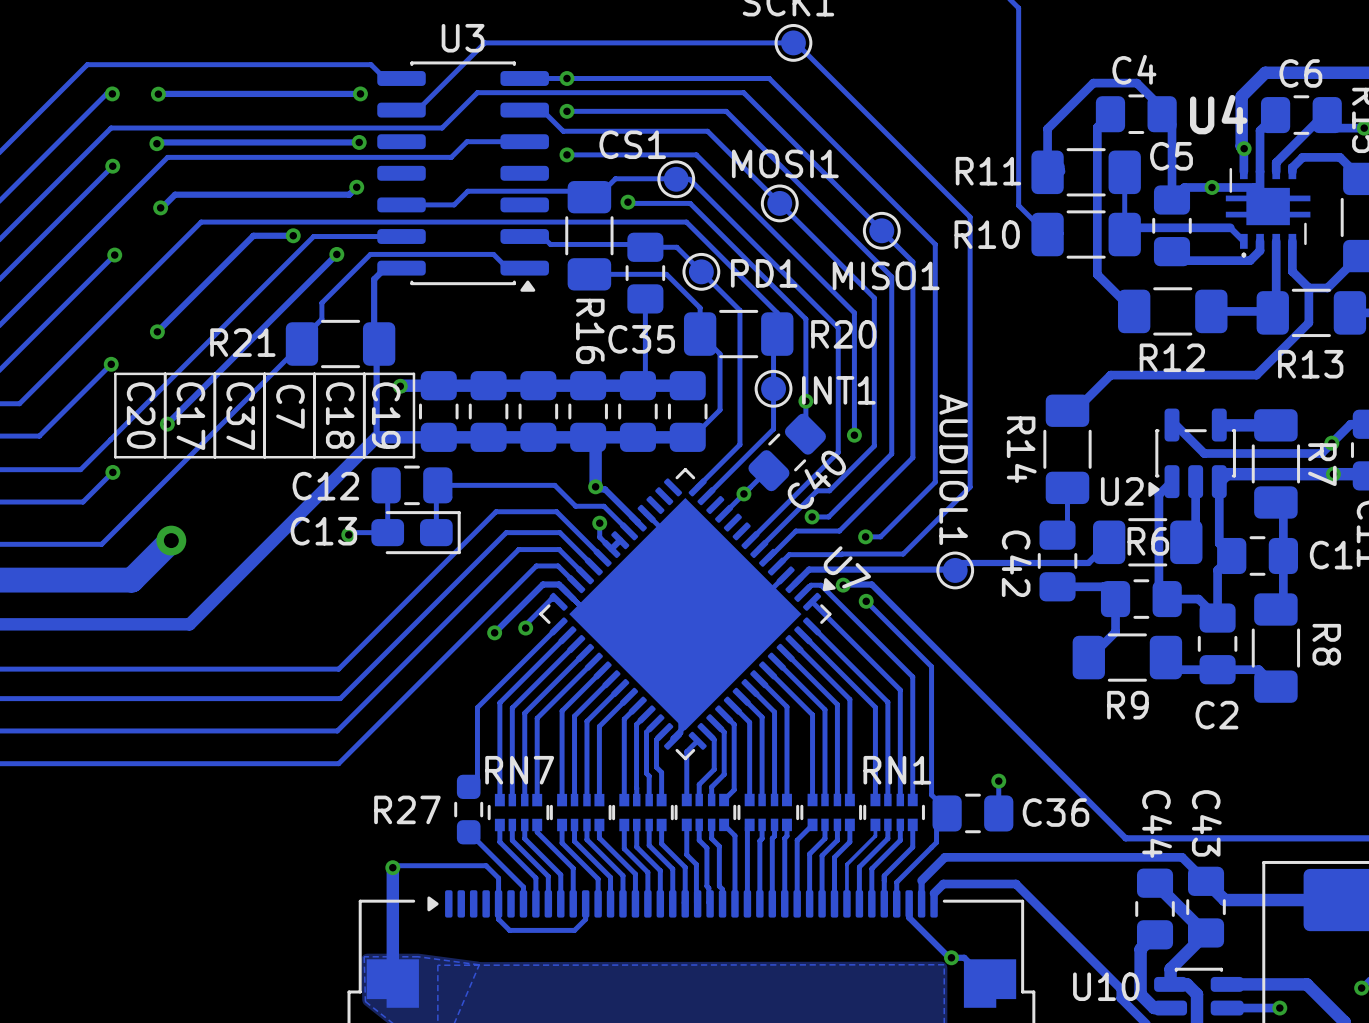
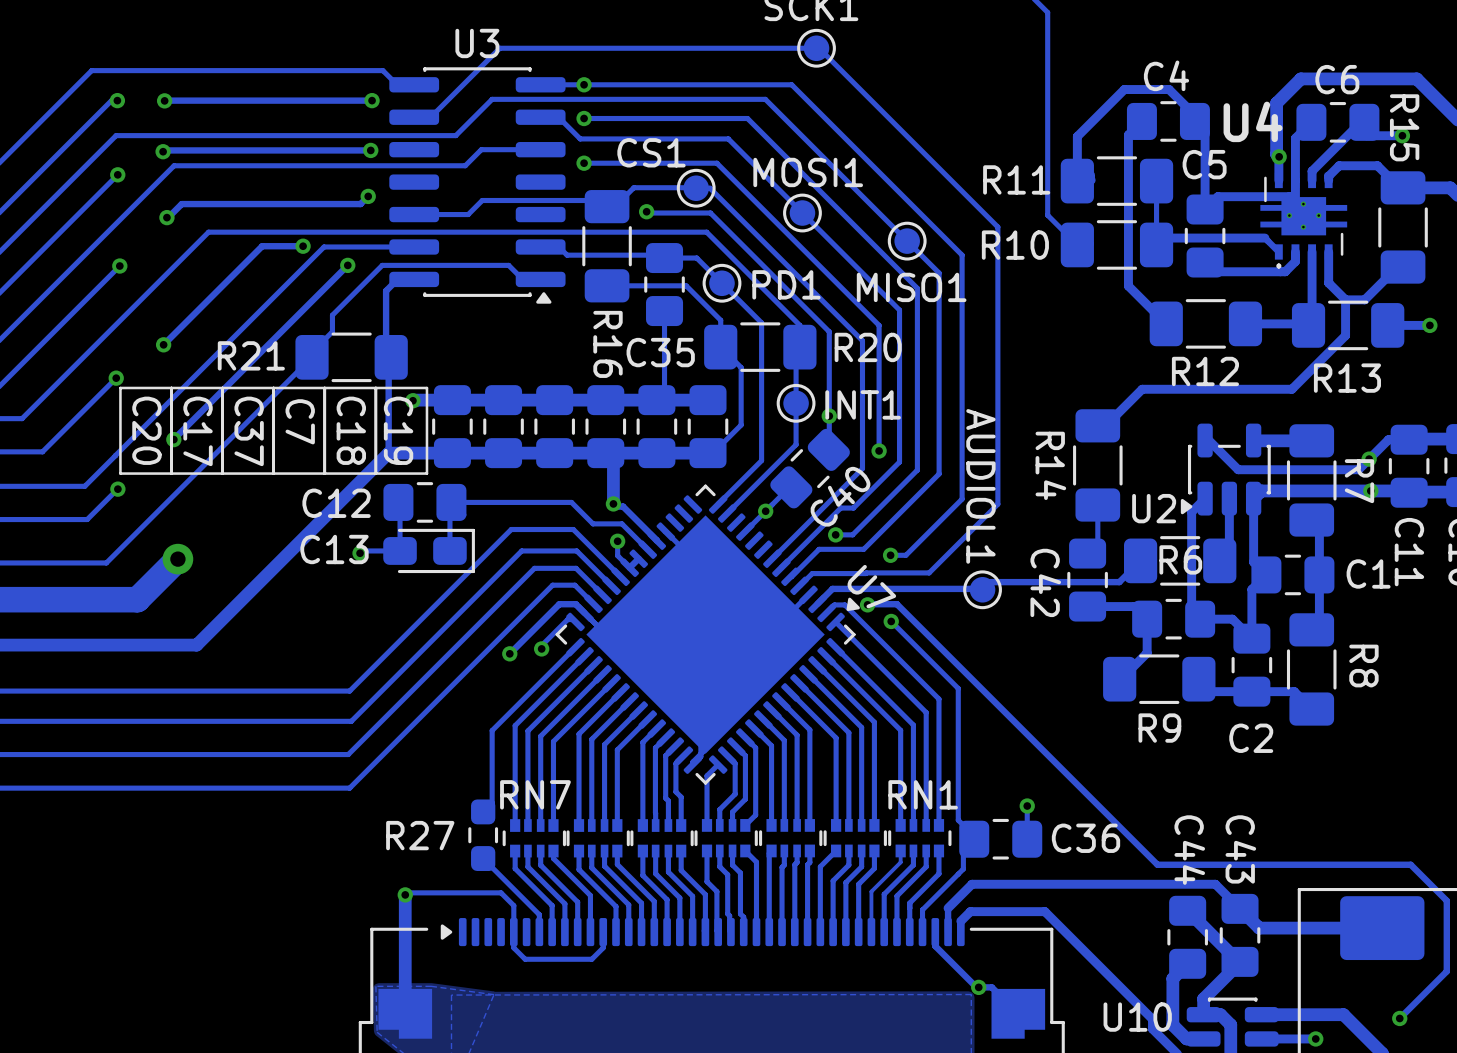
via: (1212, 187) -> none
via: none -> (1303, 204)
via: none -> (1289, 215)
via: none -> (1318, 215)
via: none -> (1303, 227)

